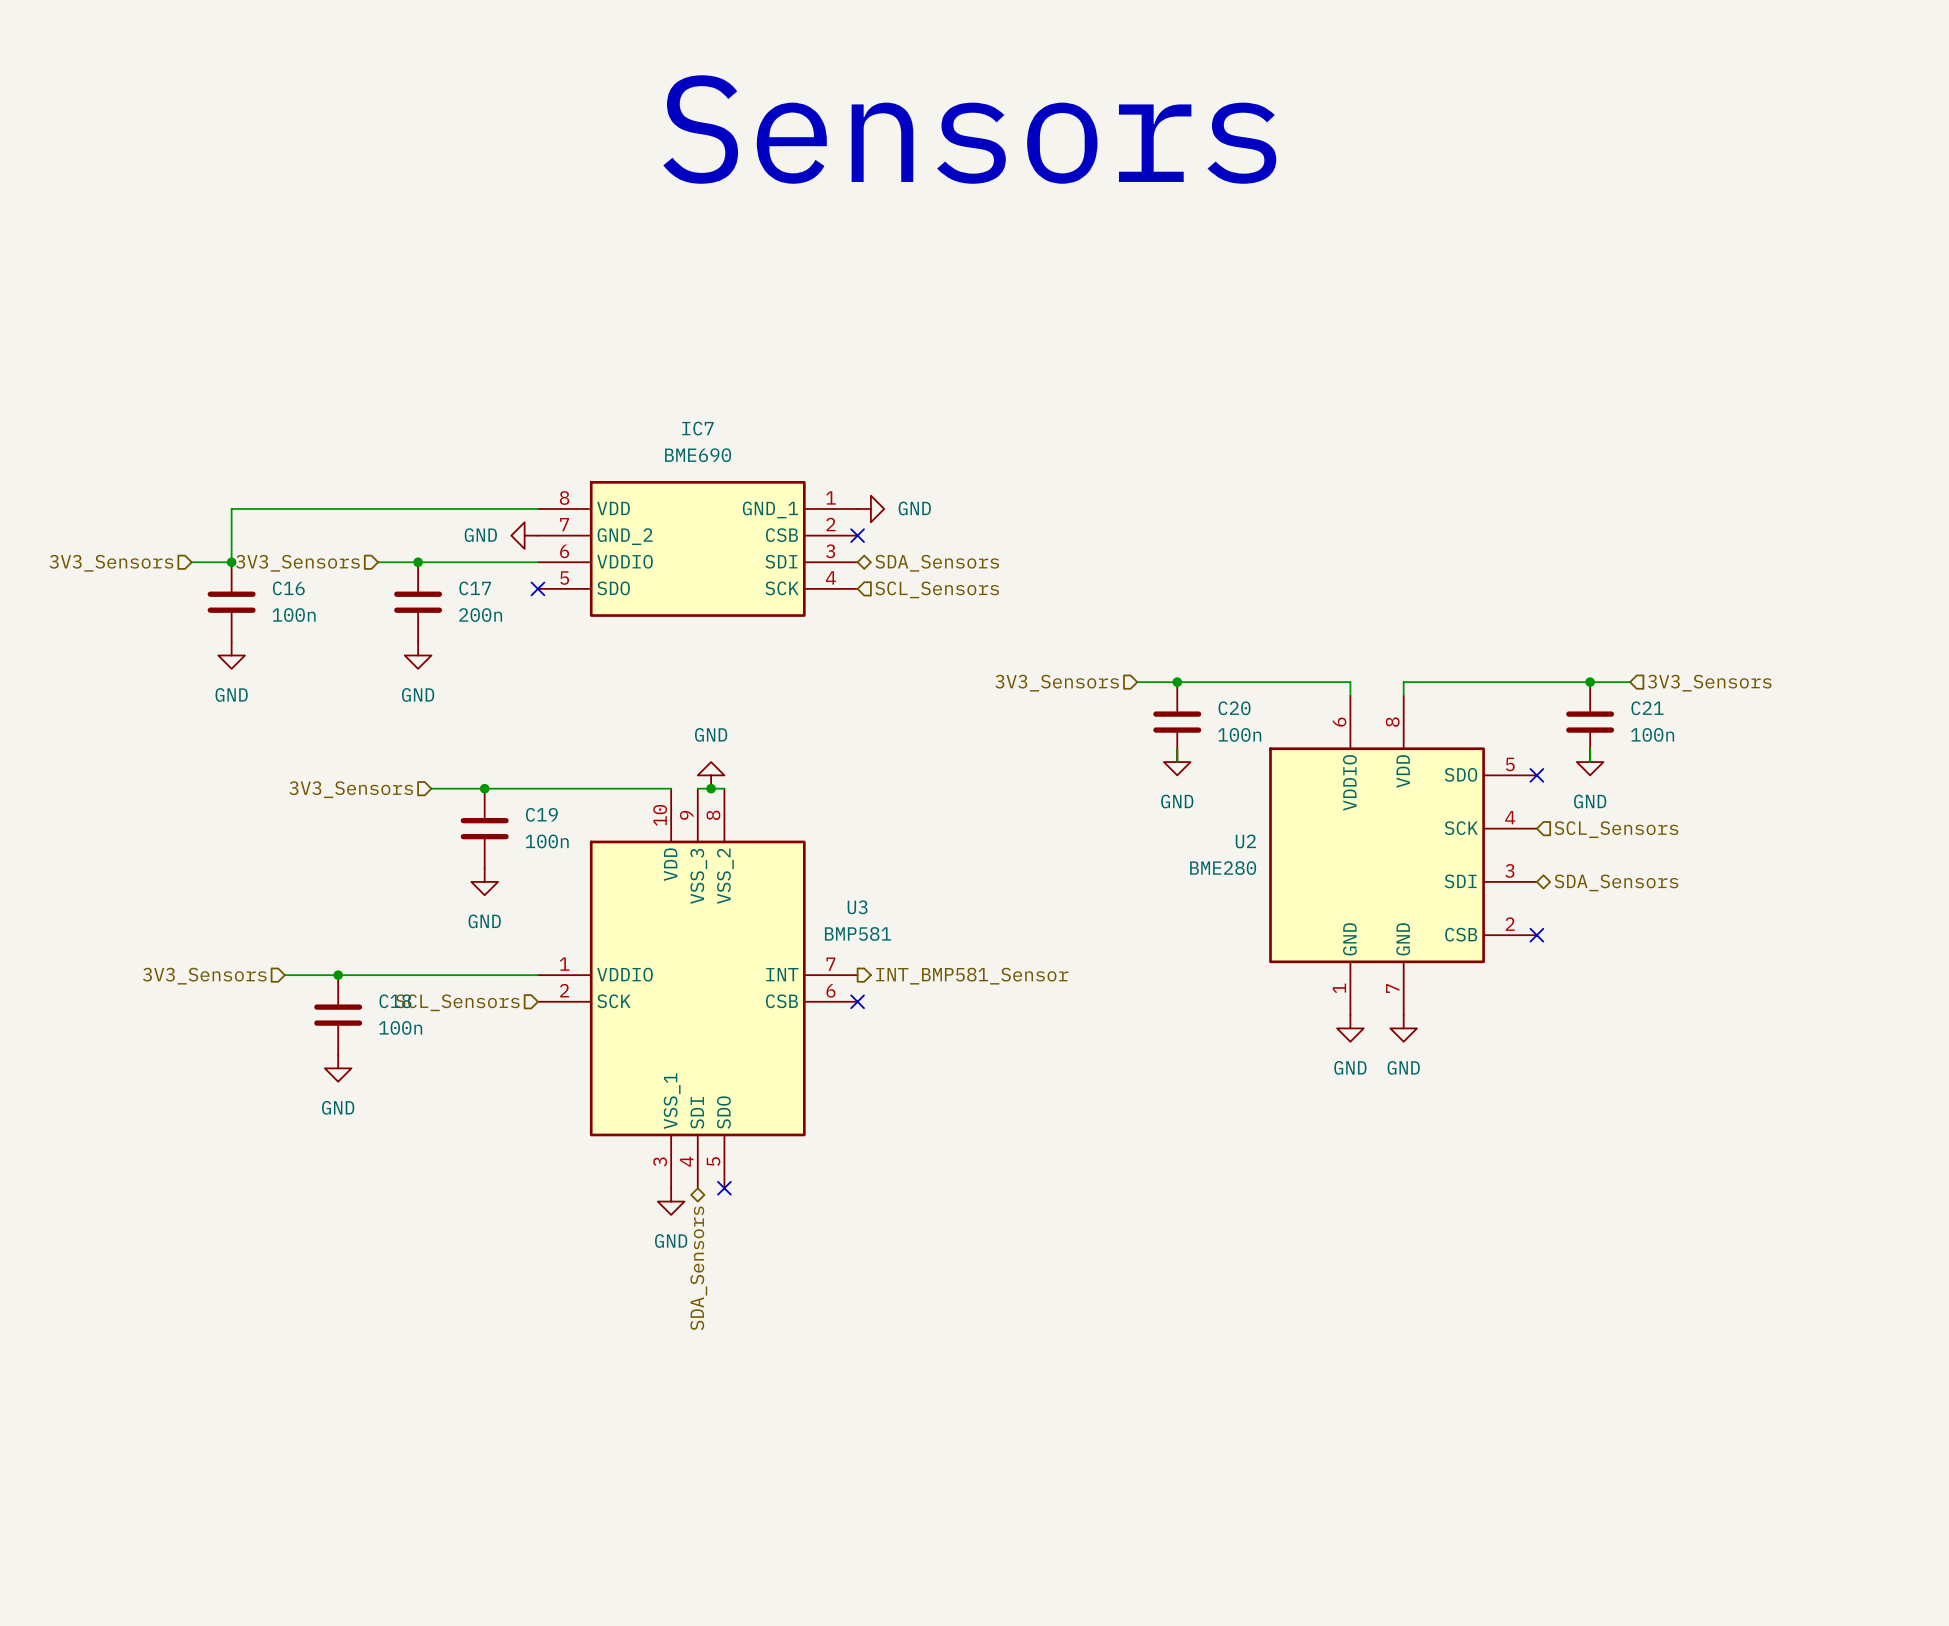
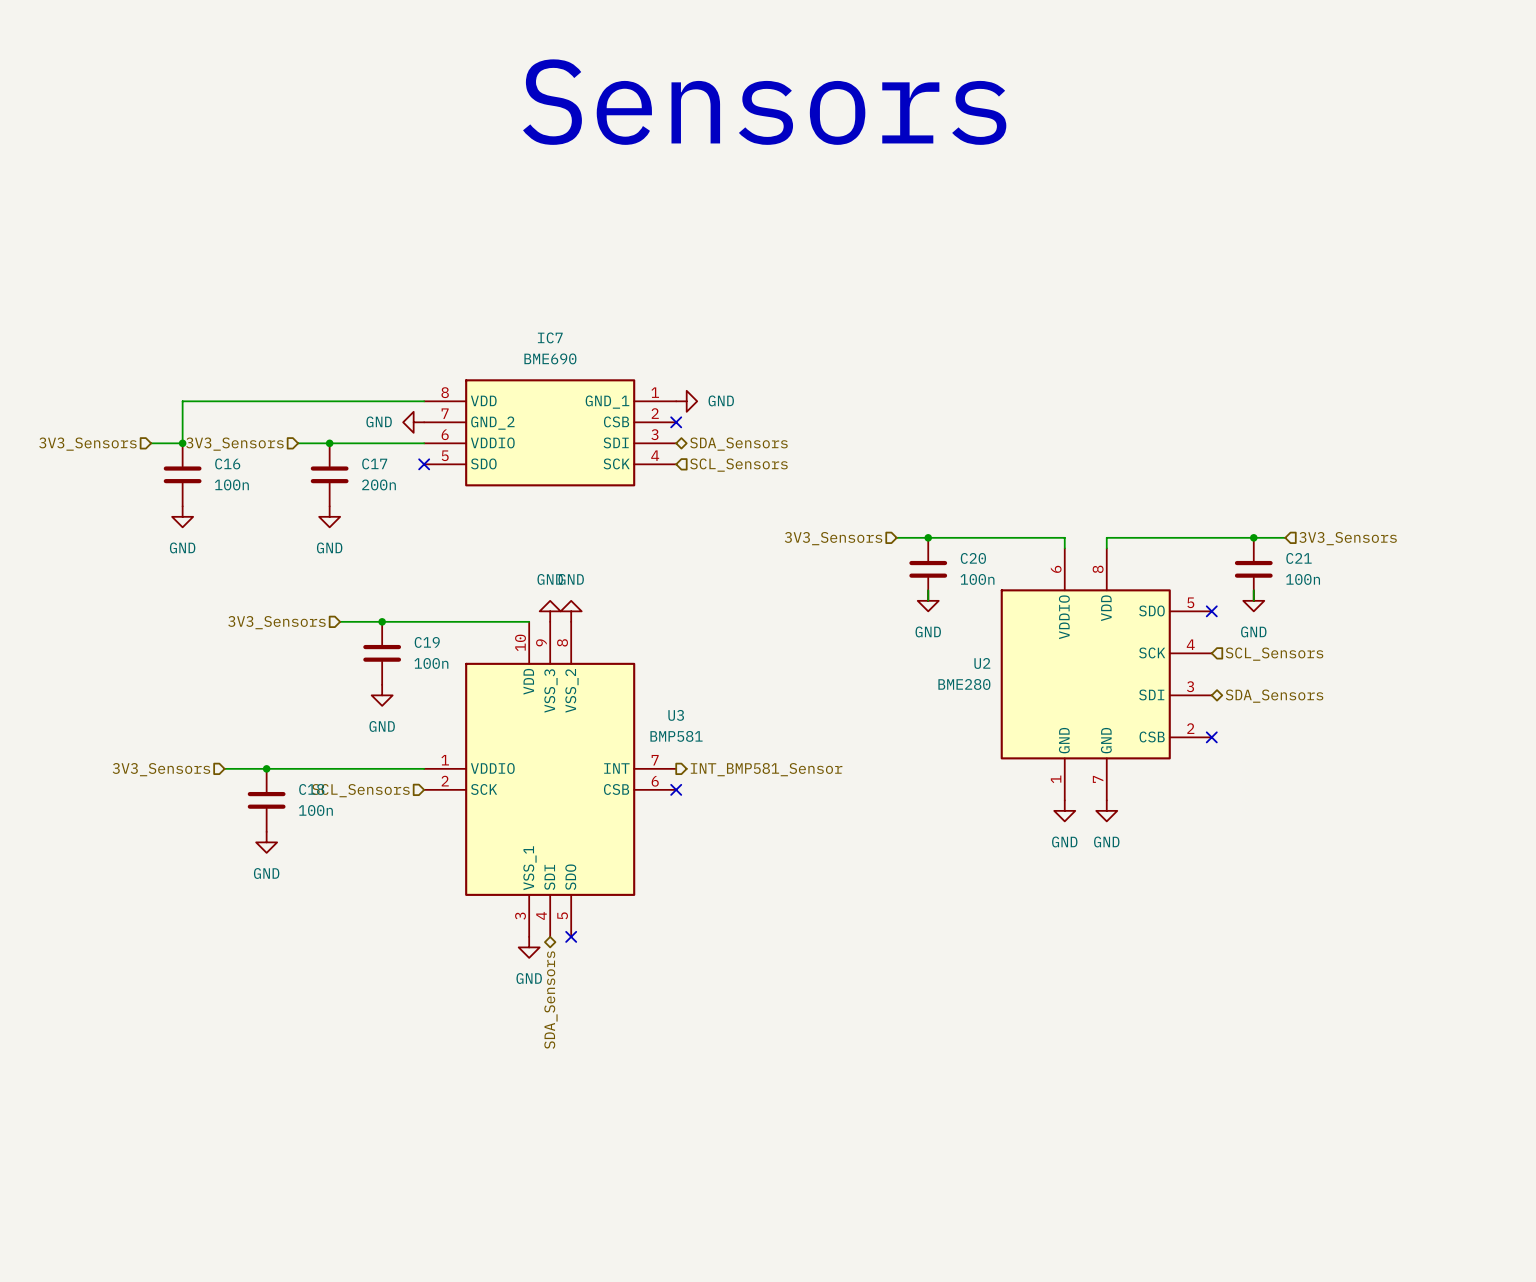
power symbol: none -> GND (550, 611)
power symbol: GND (711, 775) -> none
power symbol: none -> GND (571, 611)
wire: (697, 788) (724, 788) -> none
junction: (711, 788) -> none

